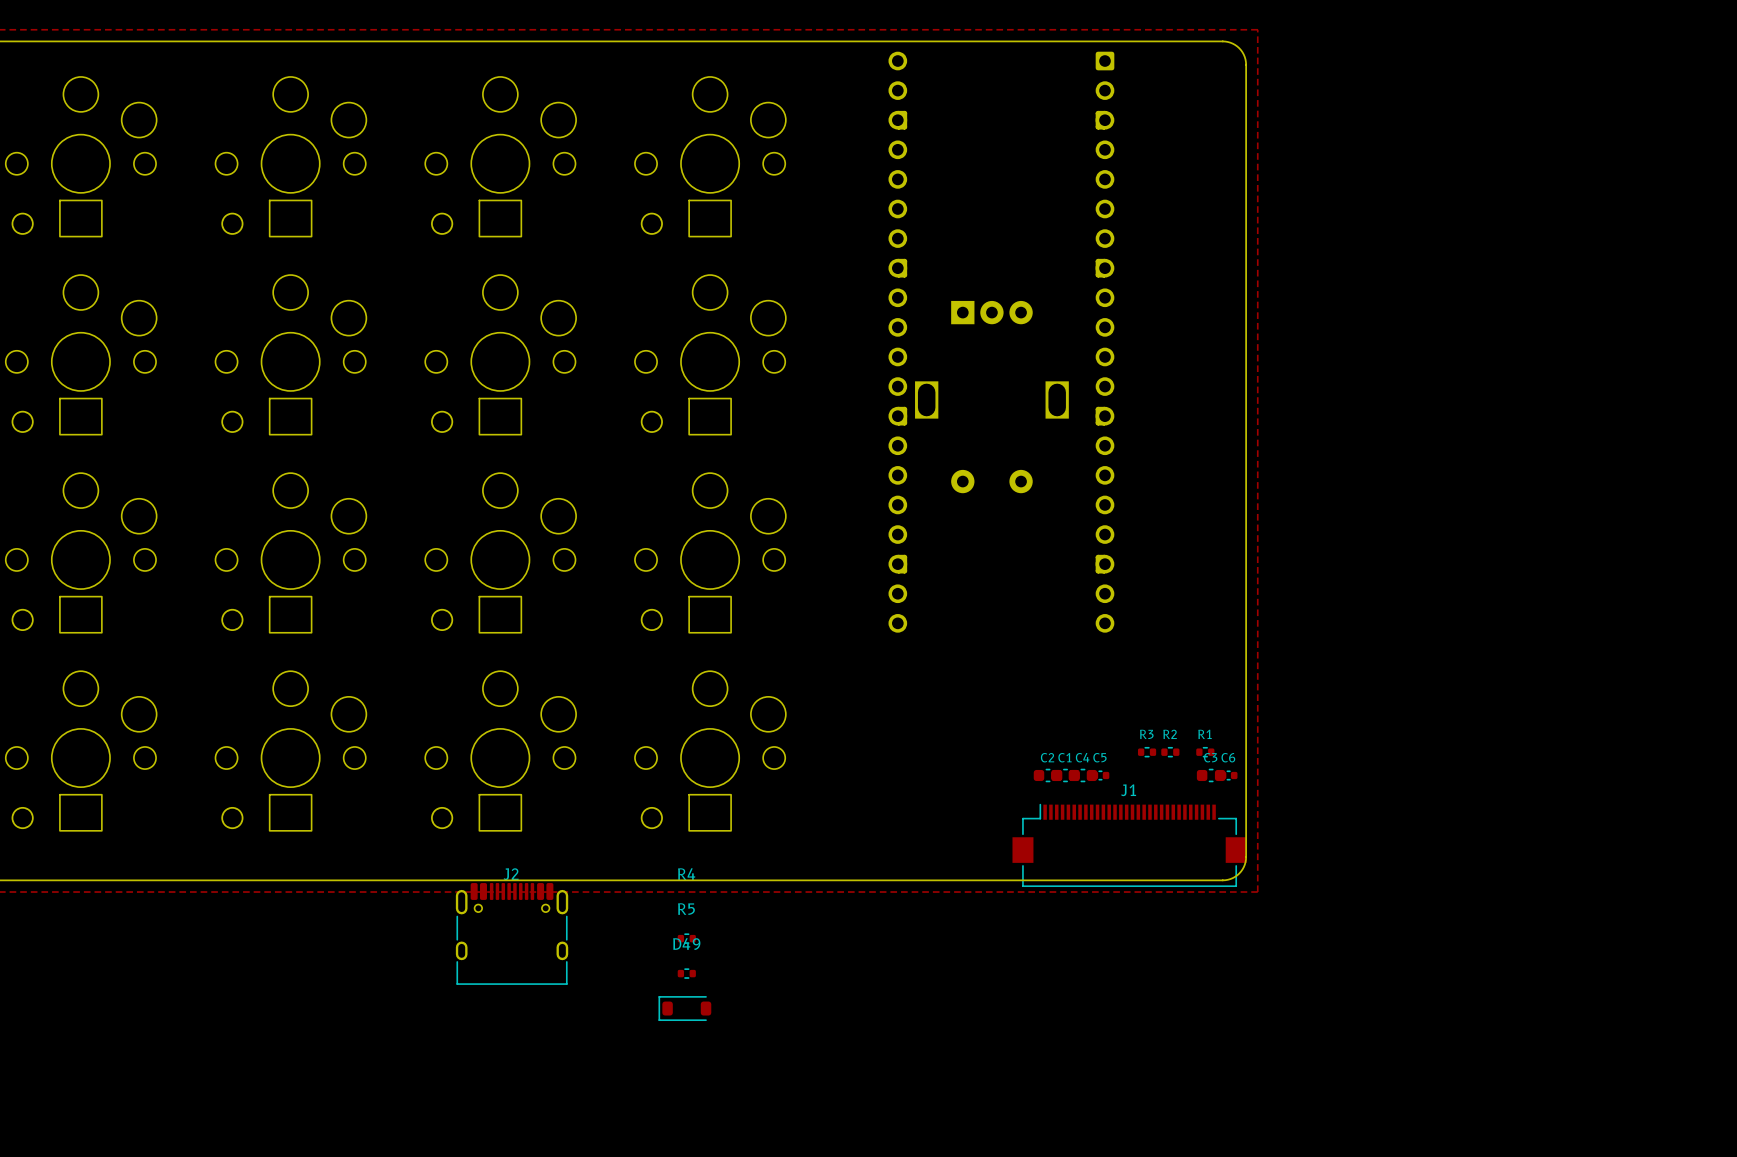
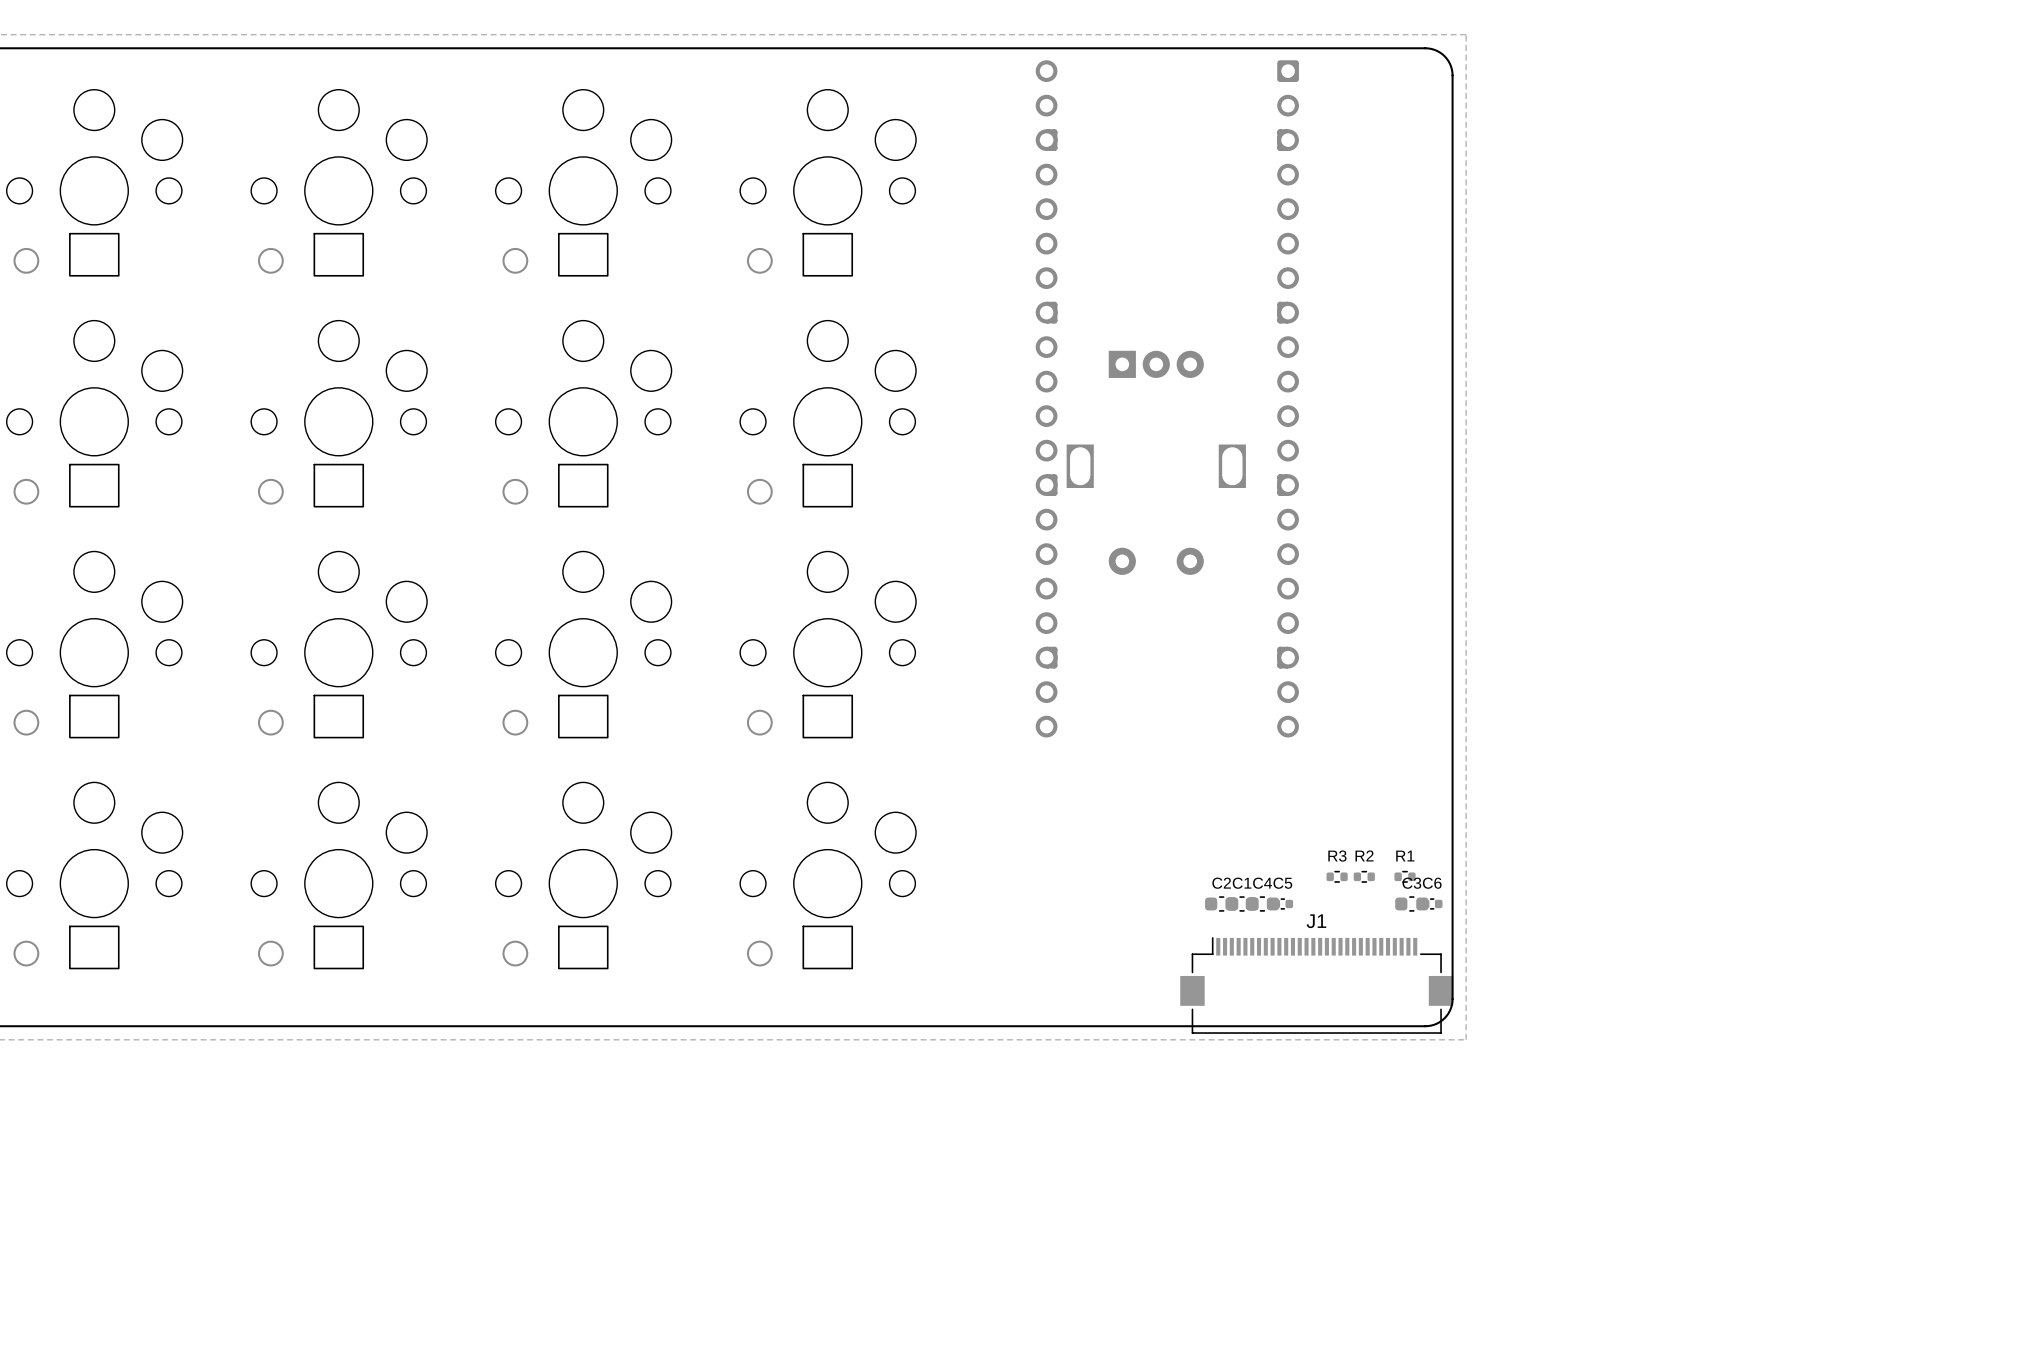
J2: (512, 933) -> none
R4: (686, 938) -> none
R5: (686, 973) -> none
D49: (684, 1008) -> none

